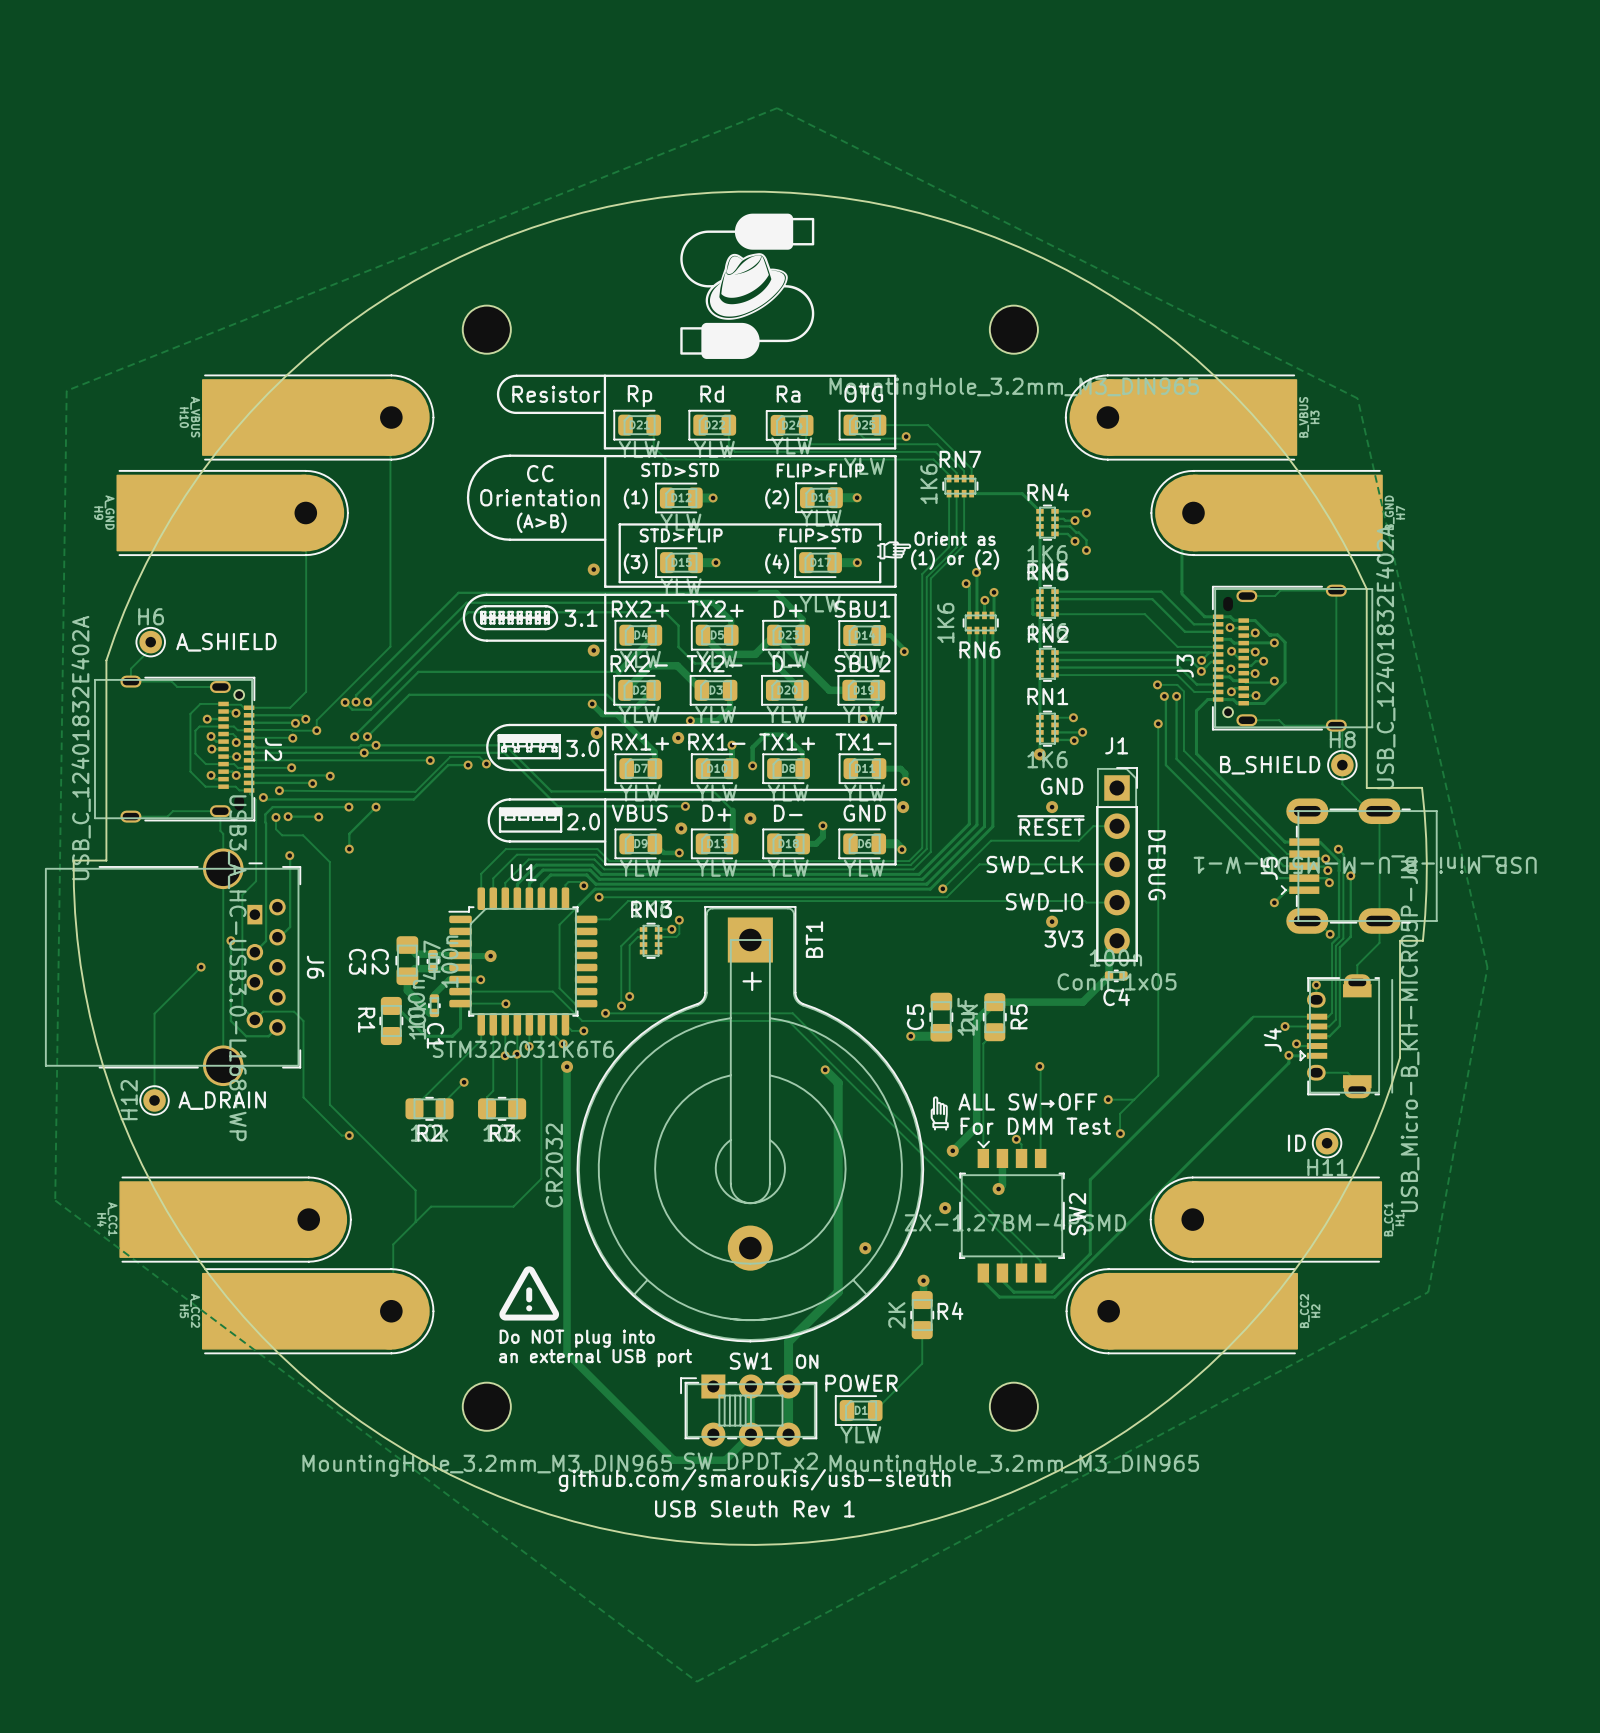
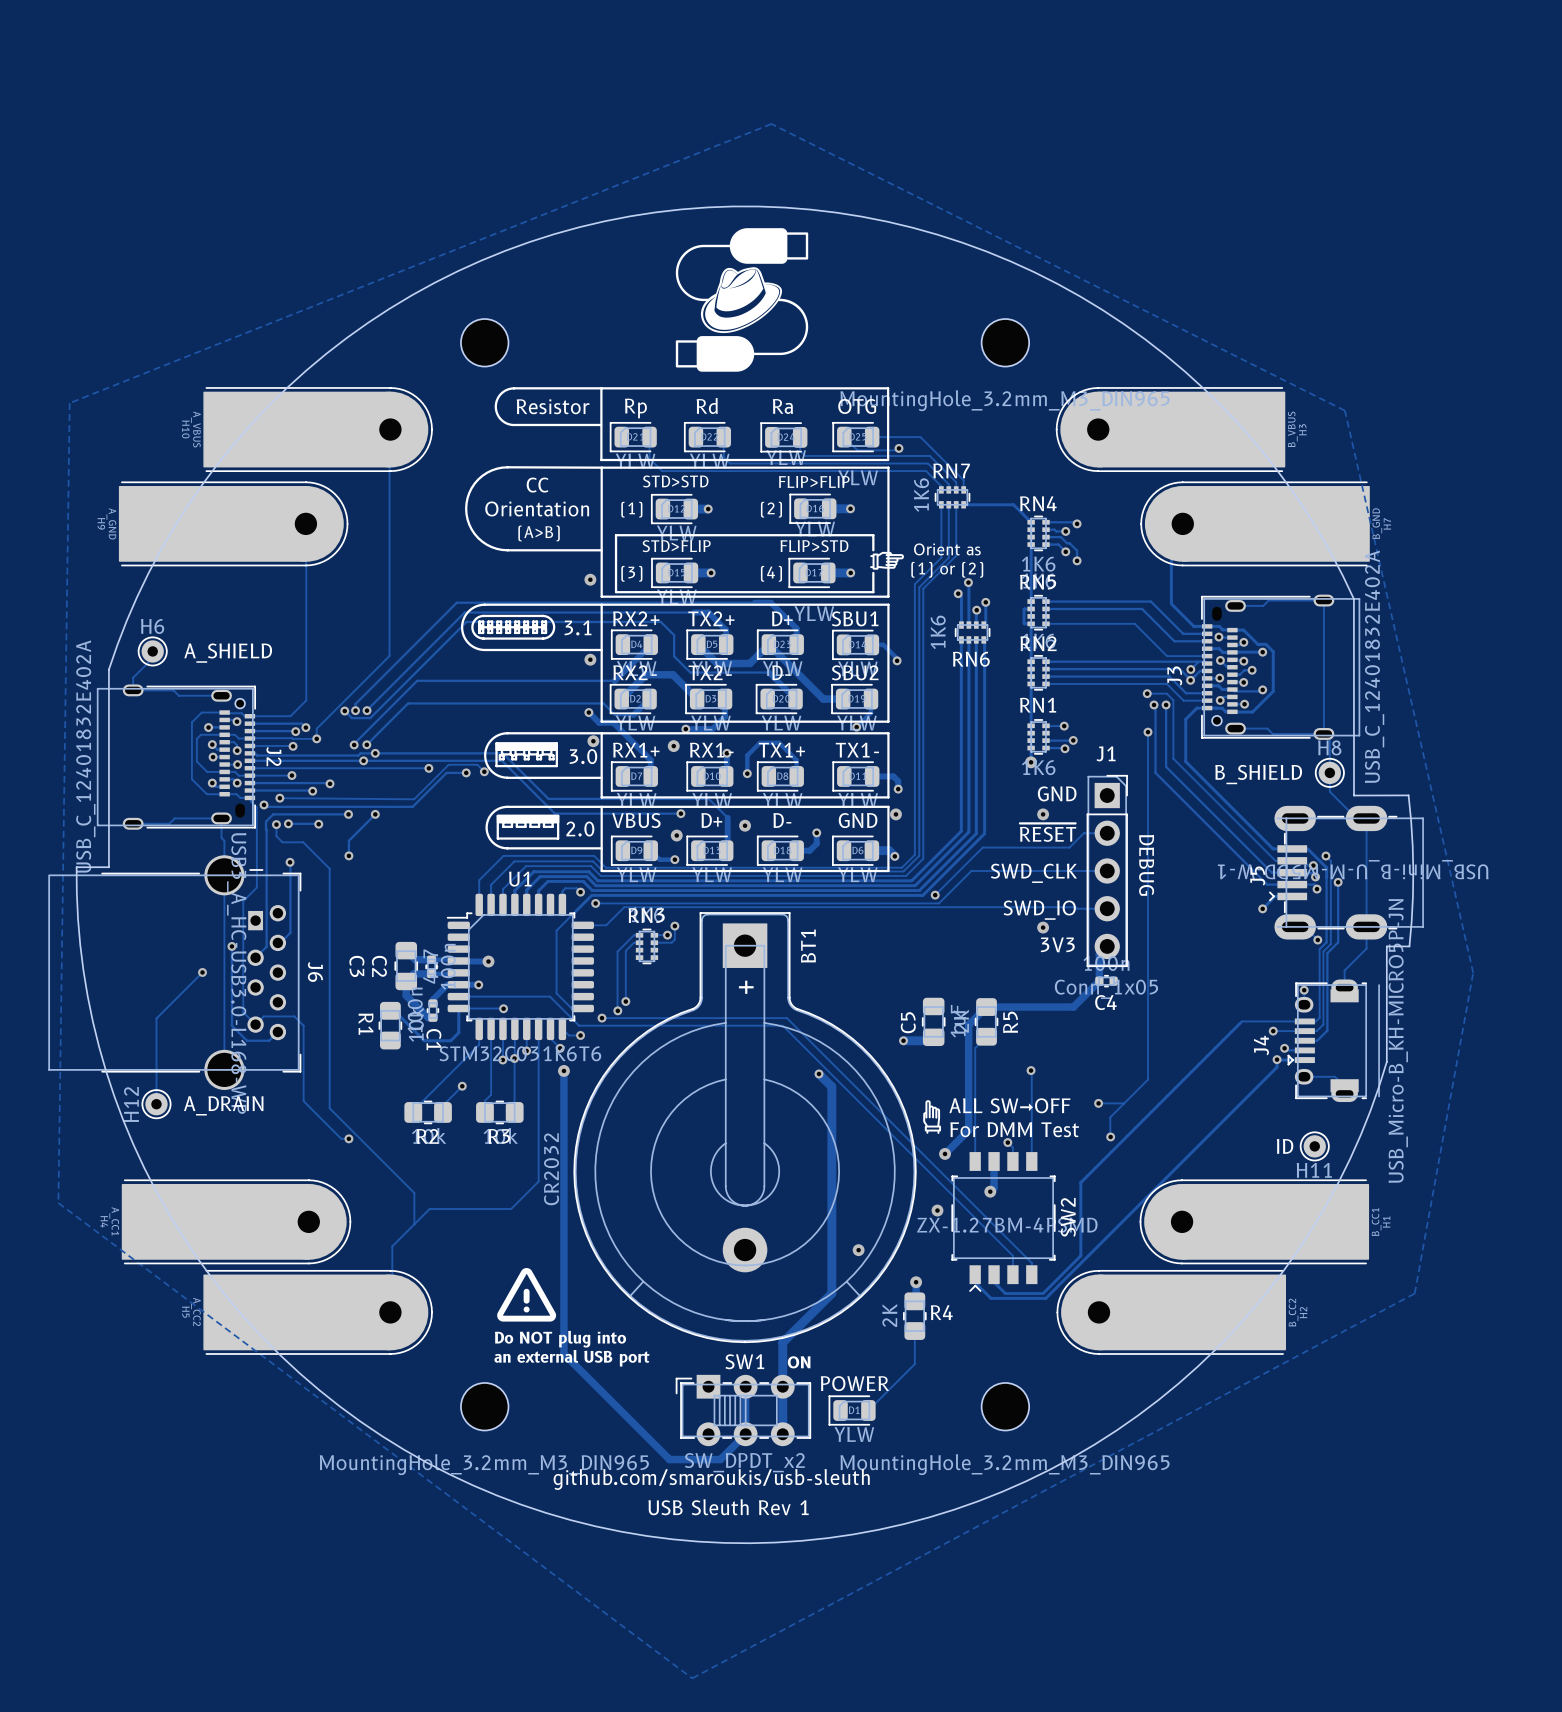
SW2 footprint: [959, 1140, 1065, 1283] -> [951, 1152, 1056, 1292]

